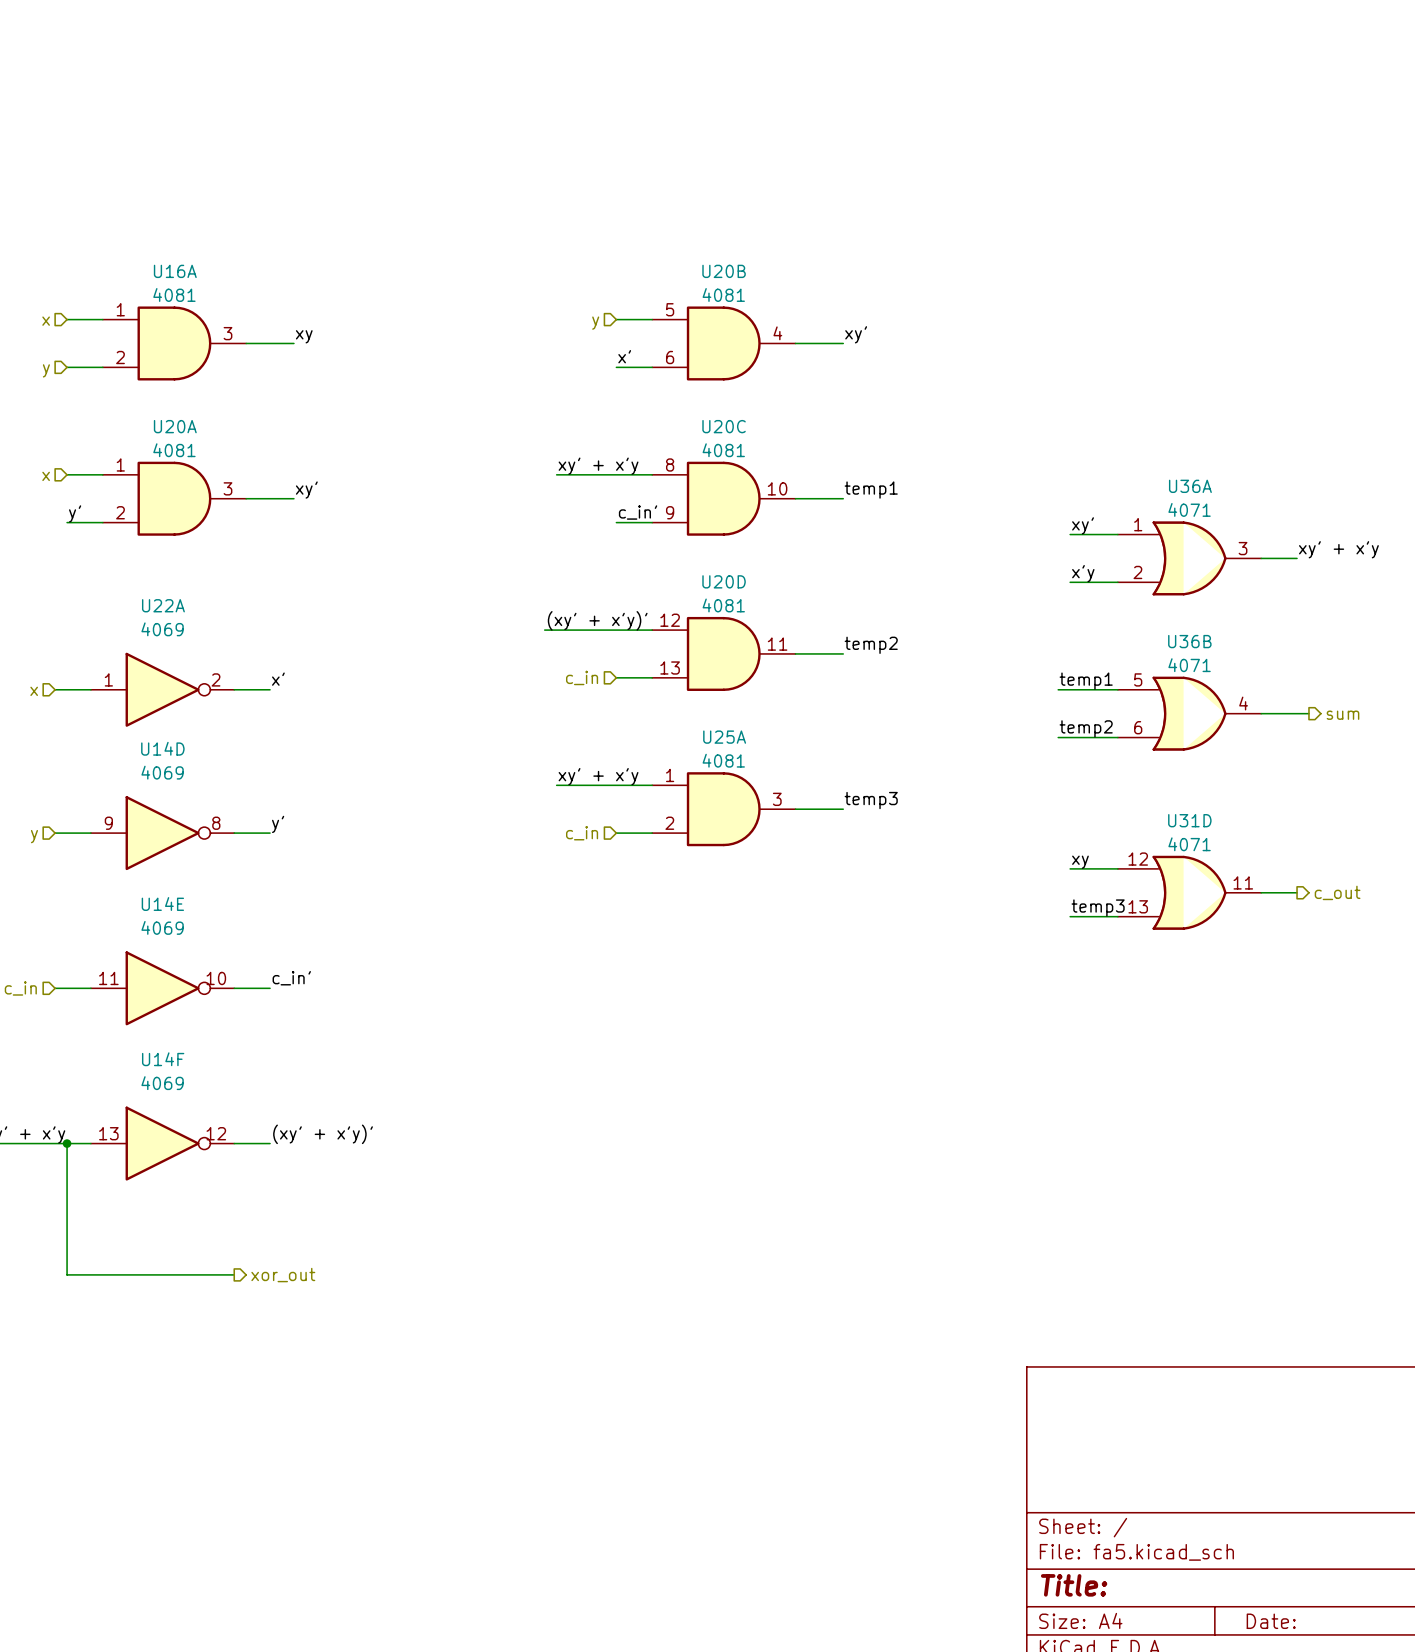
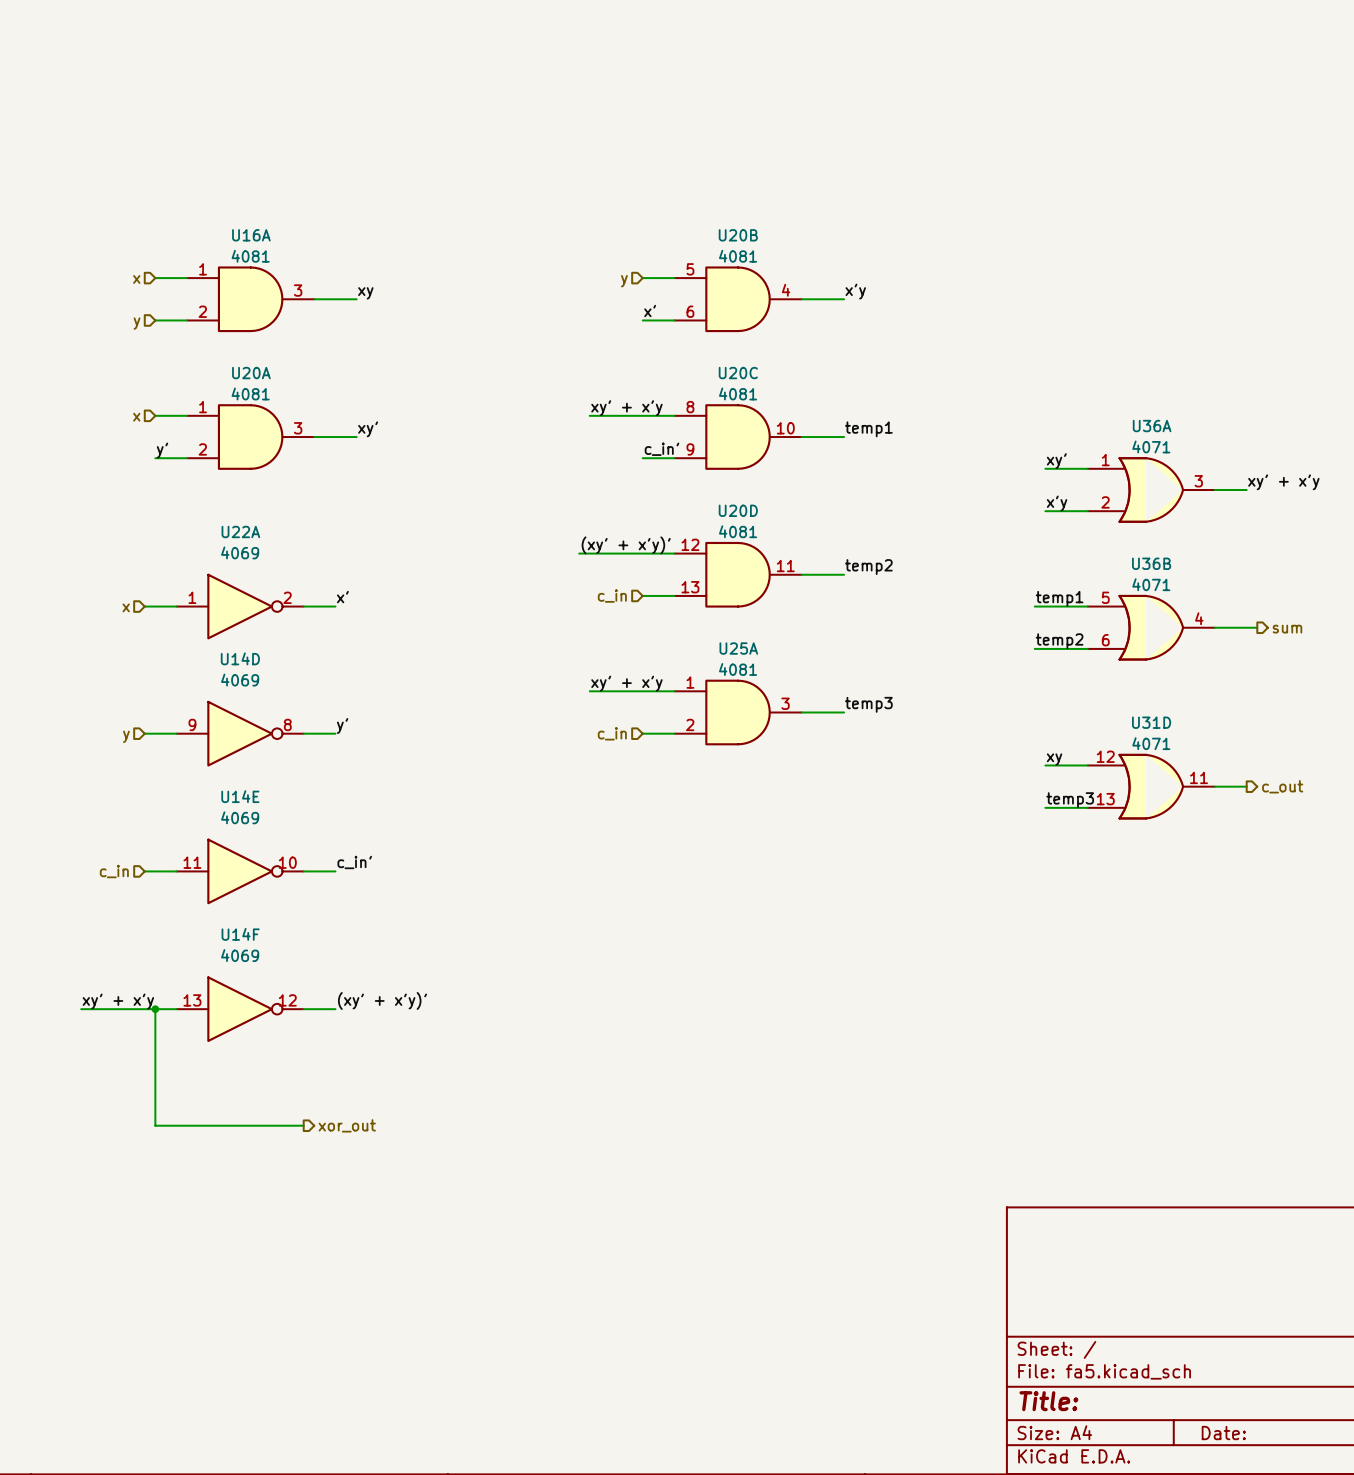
label: xy' (856, 334) -> x'y (855, 291)

